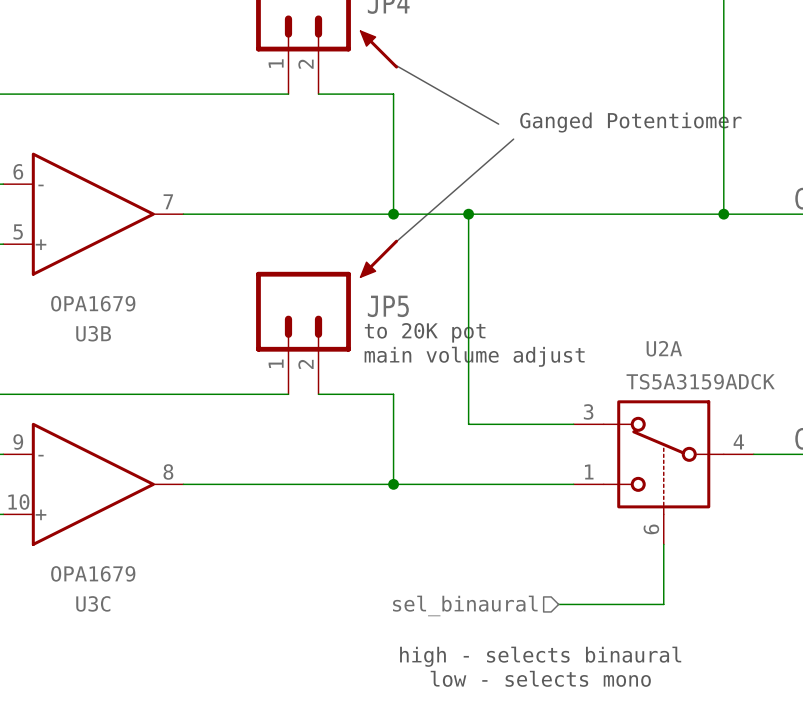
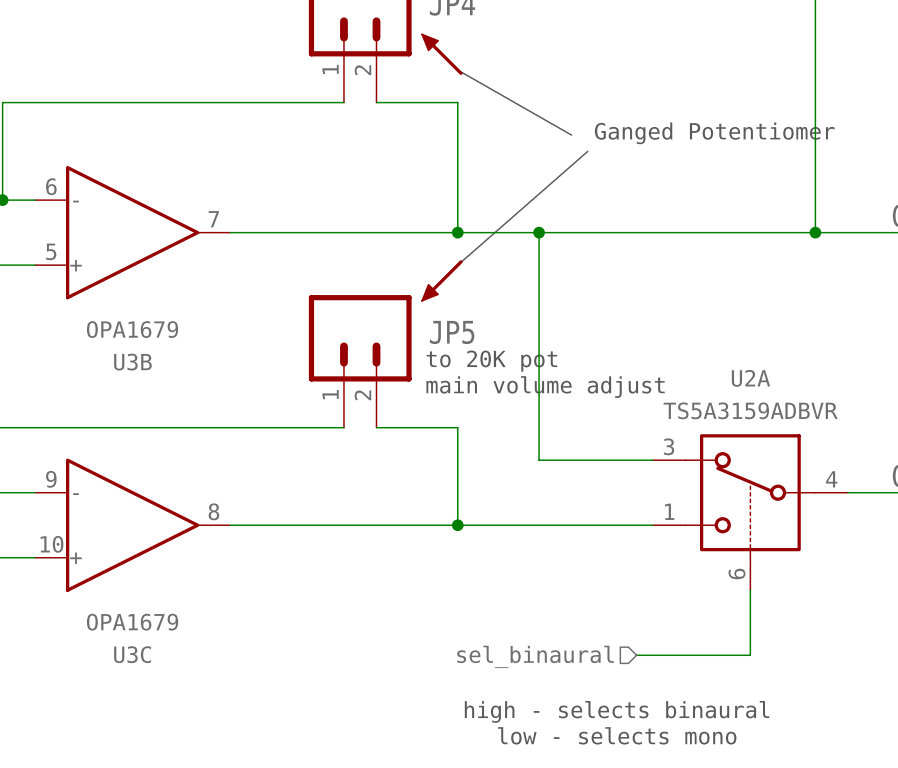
U2A value: TS5A3159ADCK (700, 381) -> TS5A3159ADBVR (750, 410)

